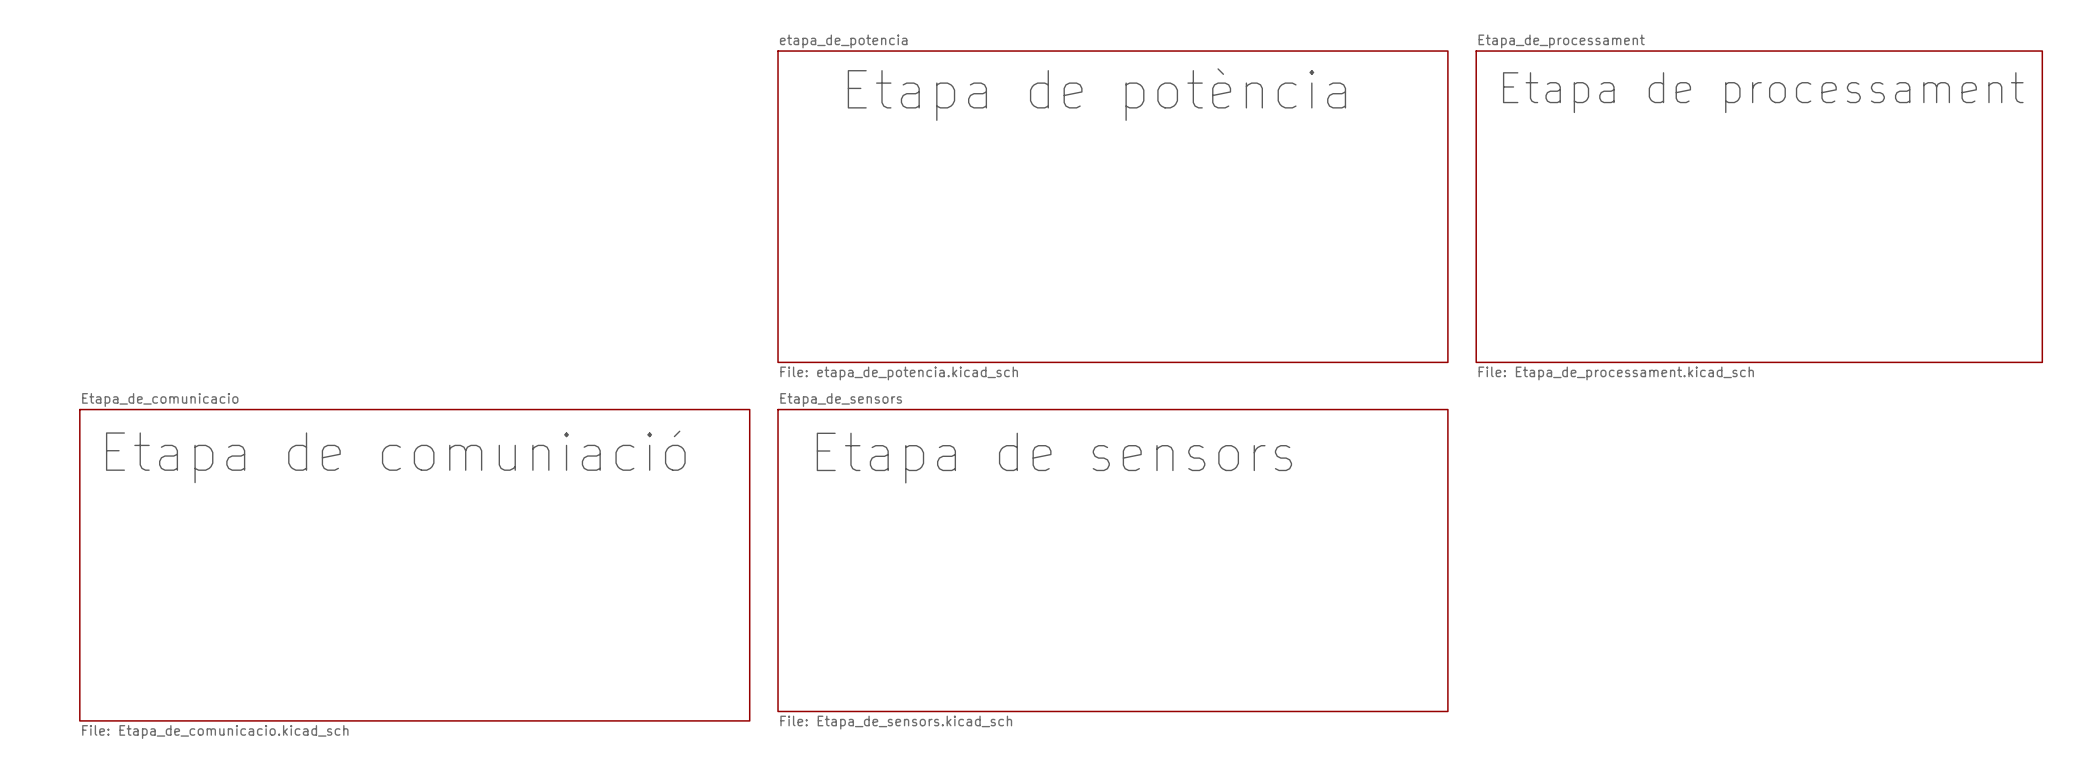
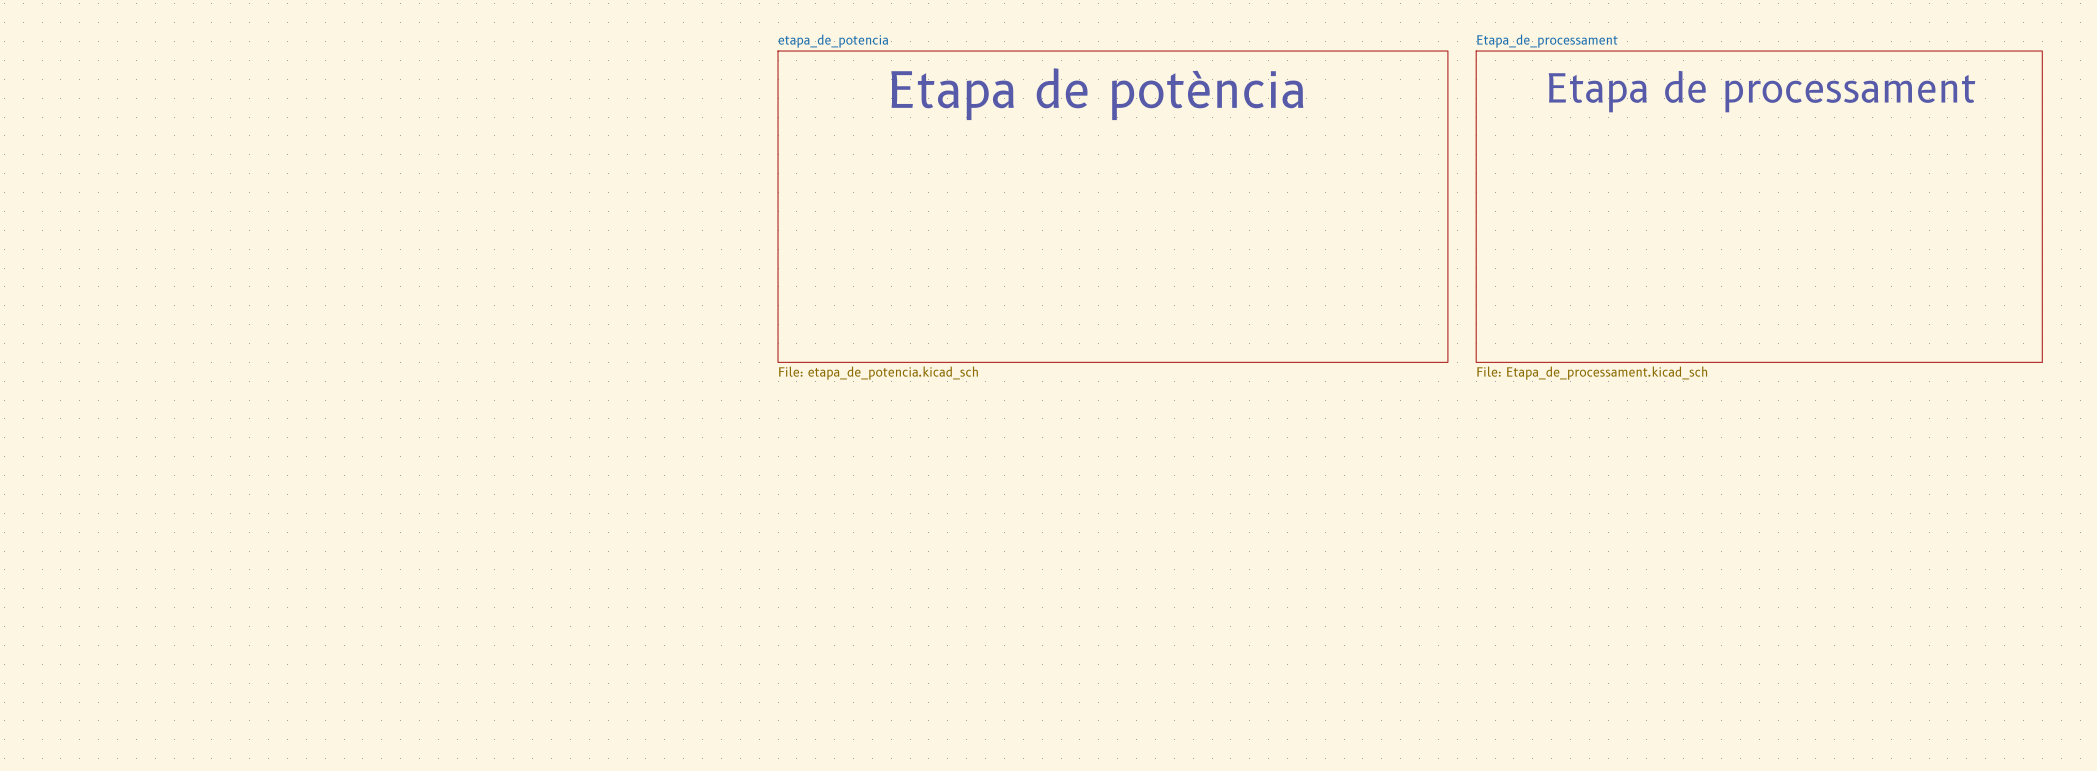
text: Etapa de comuniació (395, 456) -> none
text: Etapa de sensors (1054, 458) -> none
sheet Etapa_de_sensors: File: Etapa_de_sensors.kicad_sch (1112, 560) -> none
sheet Etapa_de_comunicacio: File: Etapa_de_comunicacio.kicad_sch (414, 565) -> none

